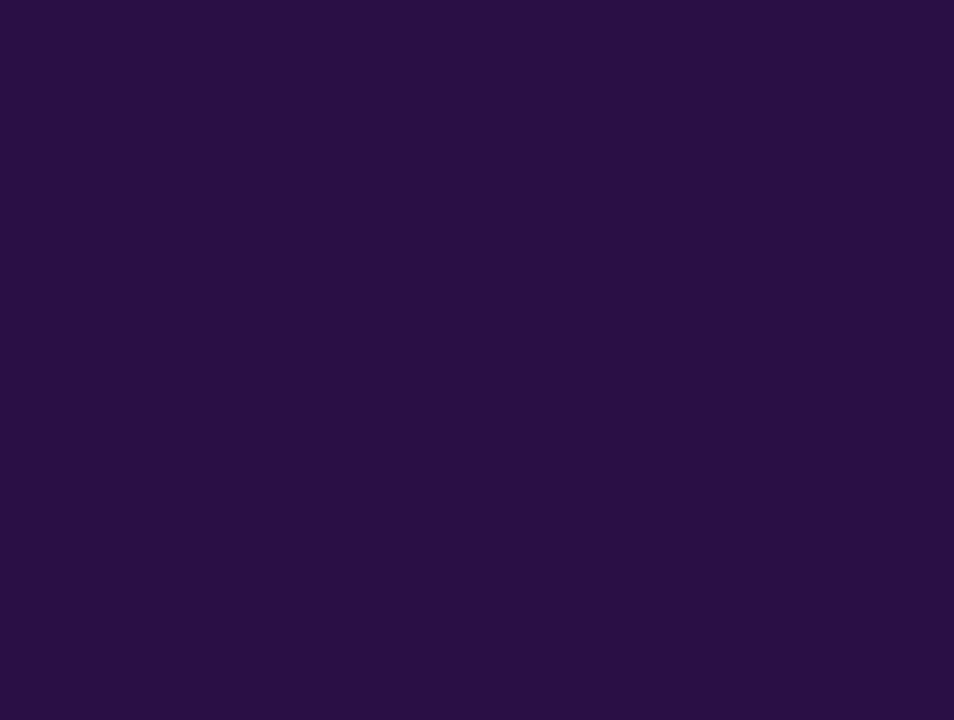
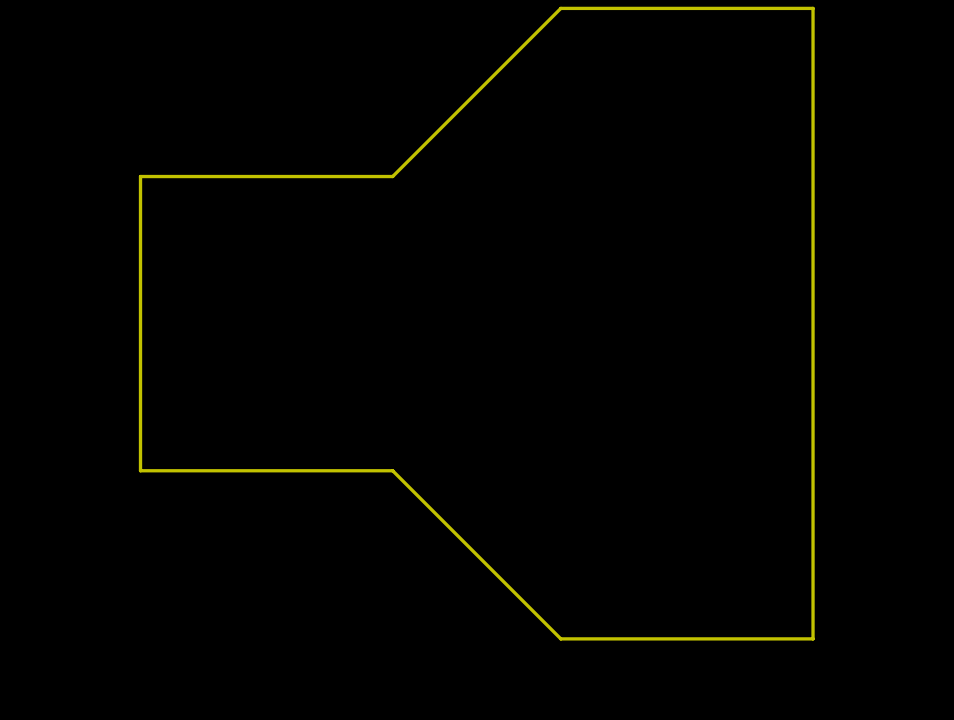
board edge: none -> (813, 8) (813, 638) (560, 638) (392, 470) (140, 470) (140, 176) (392, 176) (560, 8) (813, 8)

